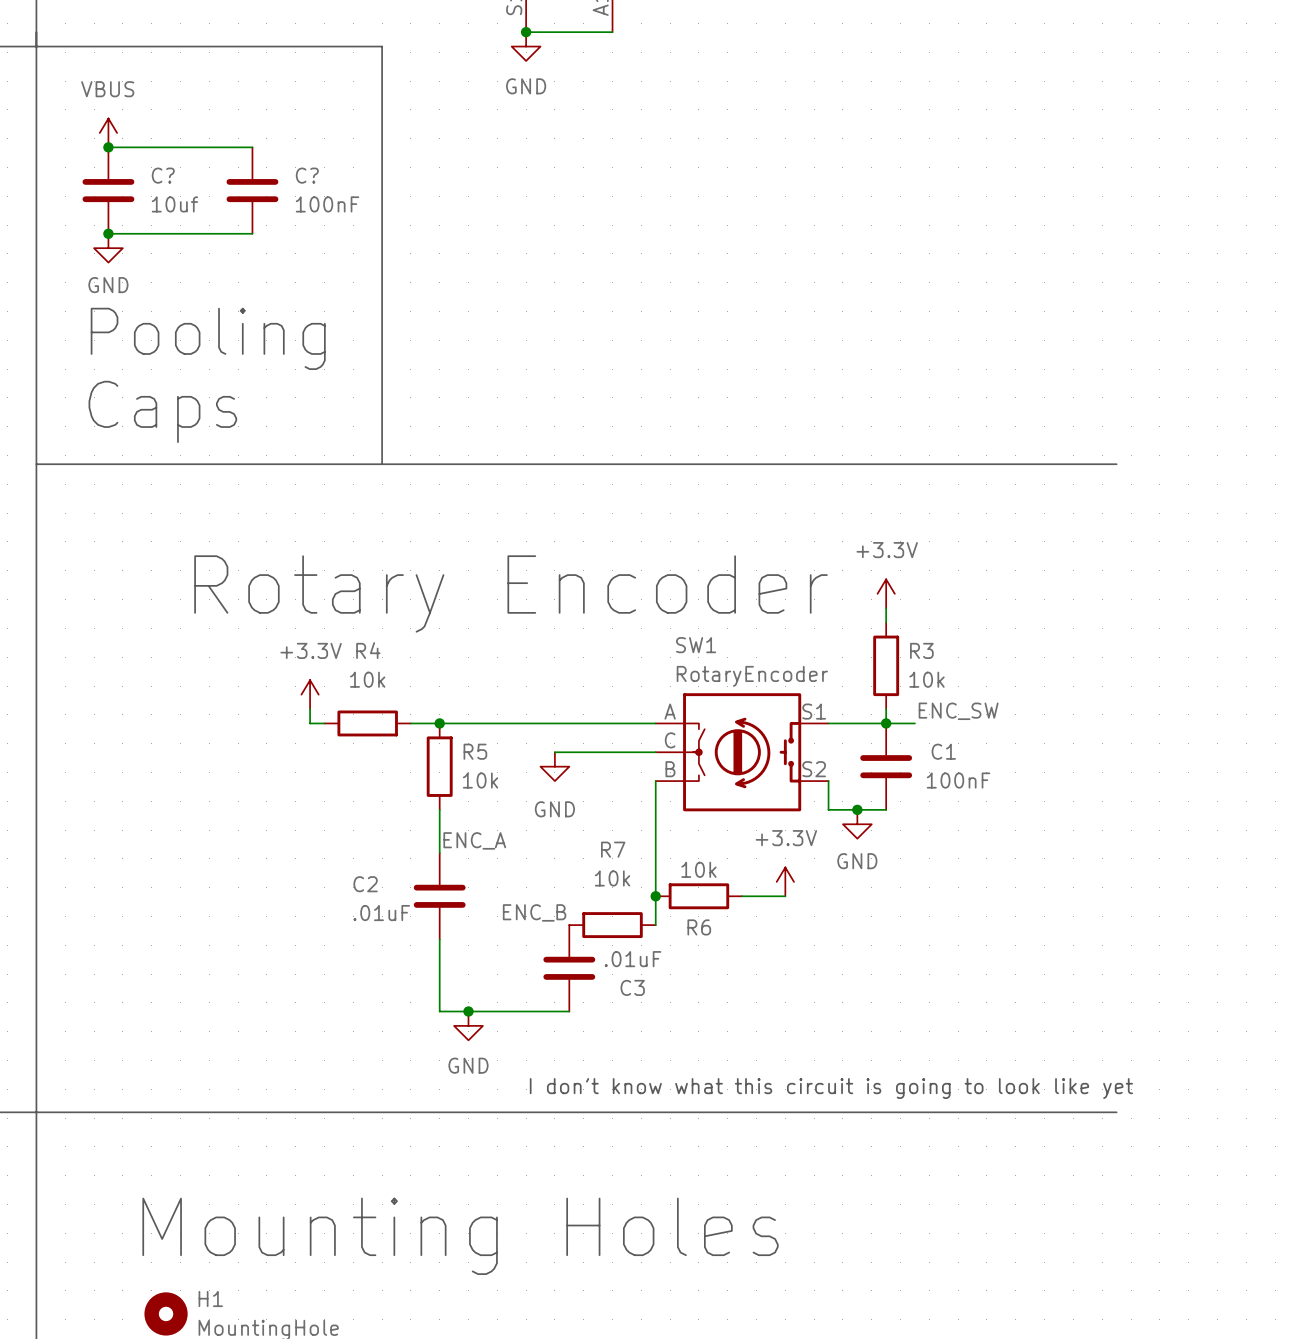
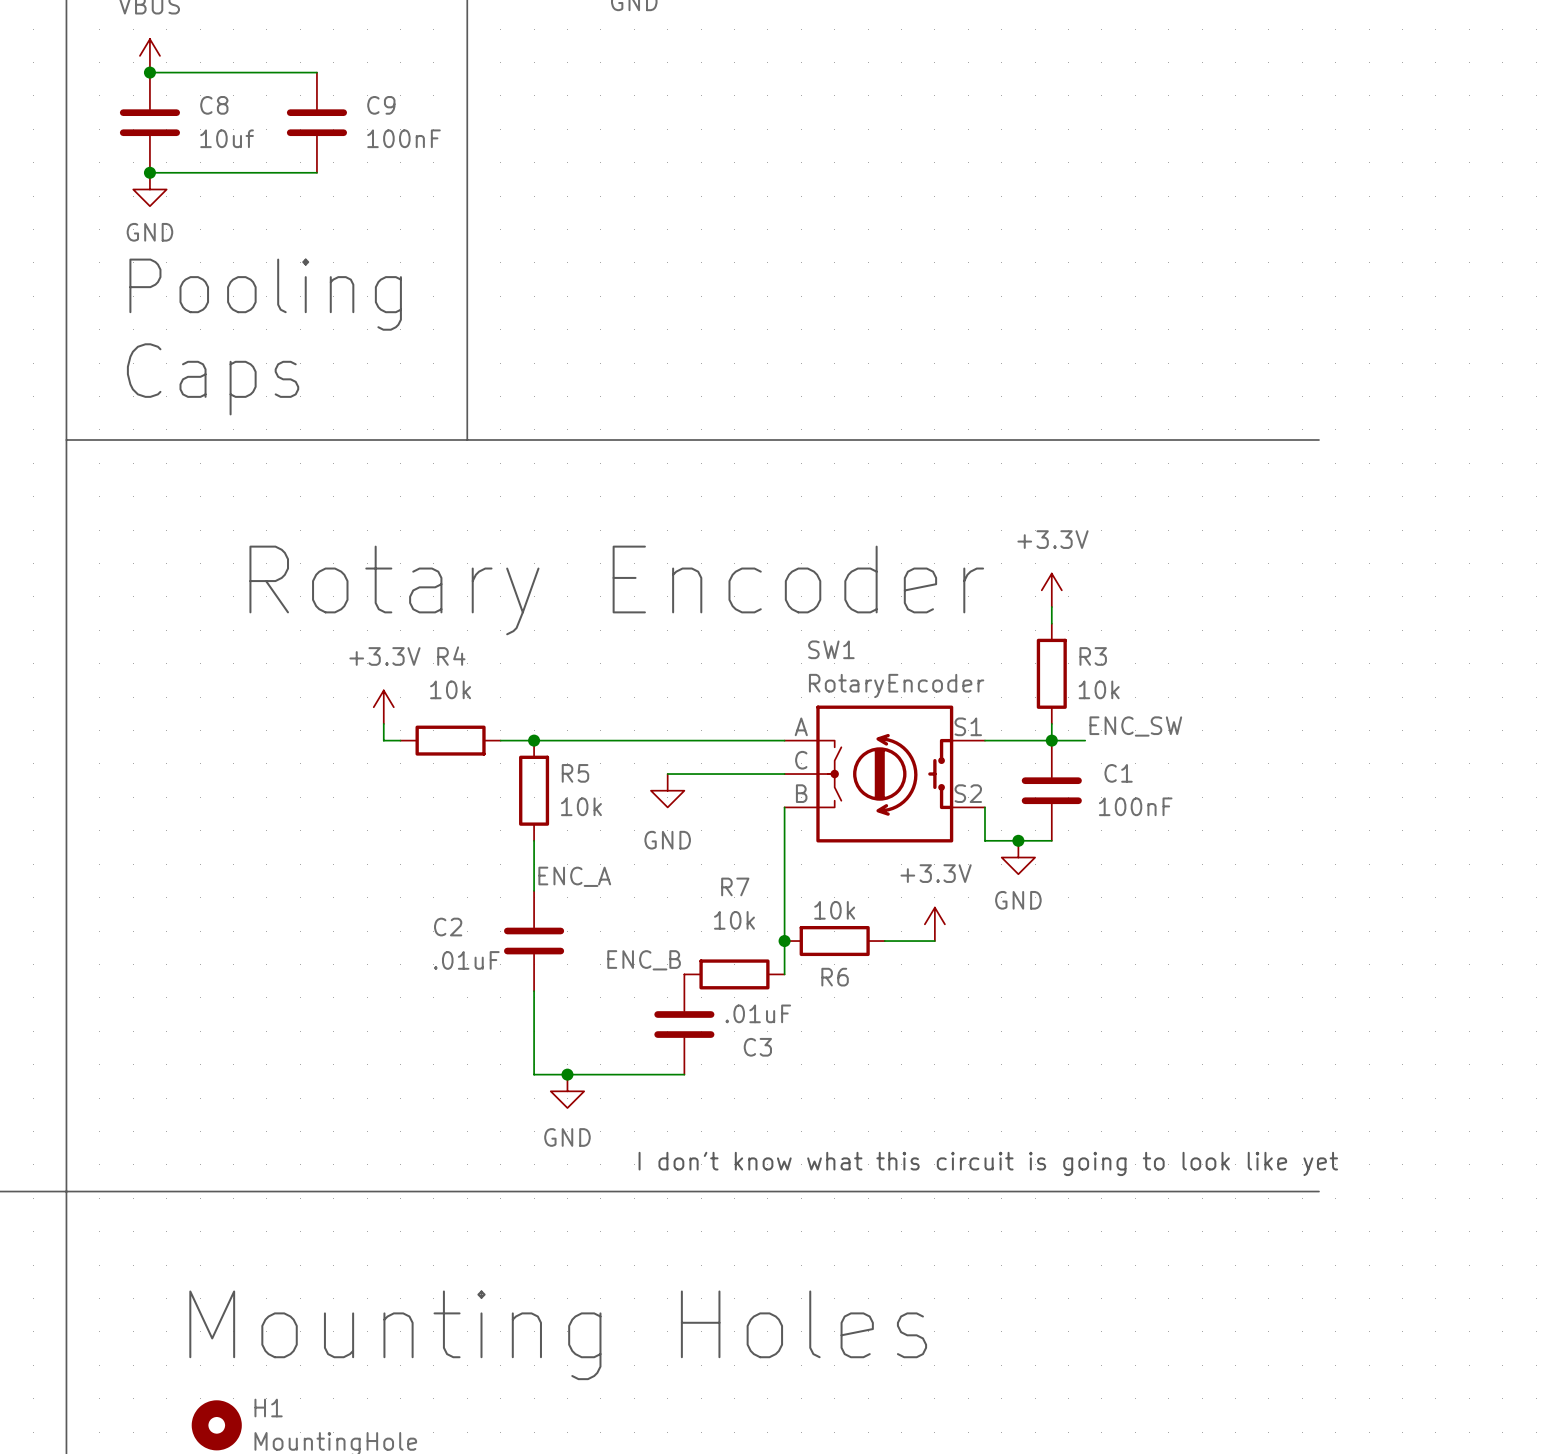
C? name: C? (163, 175) -> C8 (214, 105)
C? name: C? (307, 175) -> C9 (381, 105)

